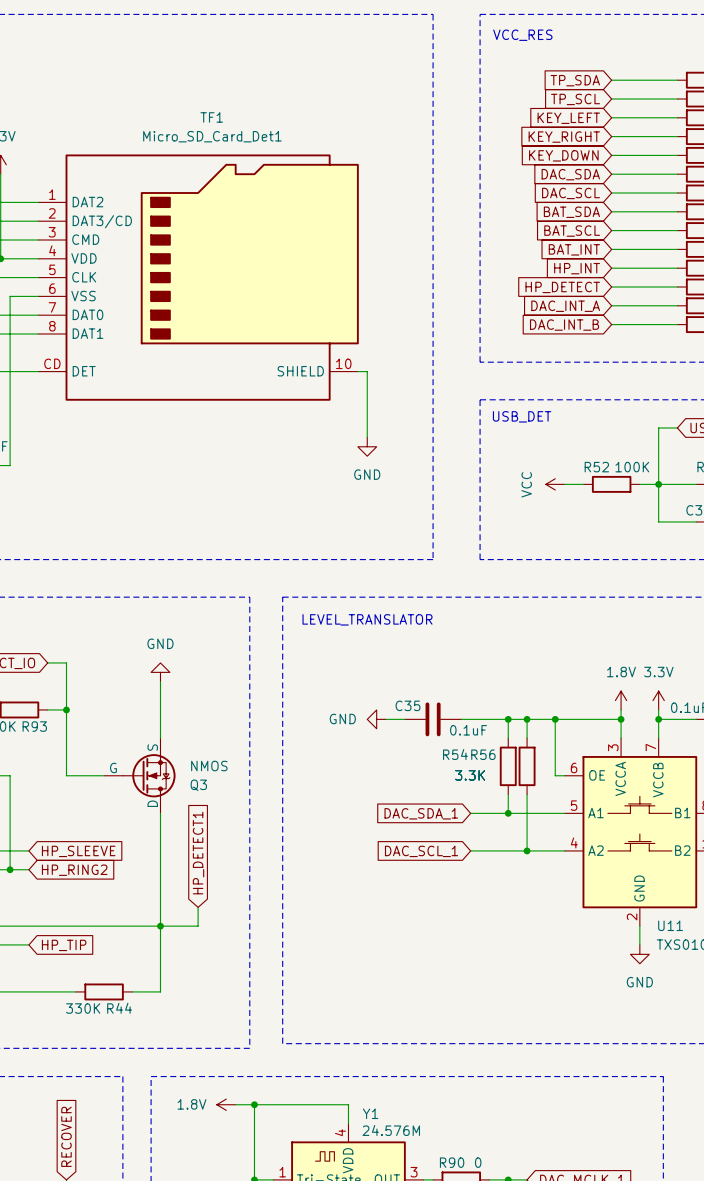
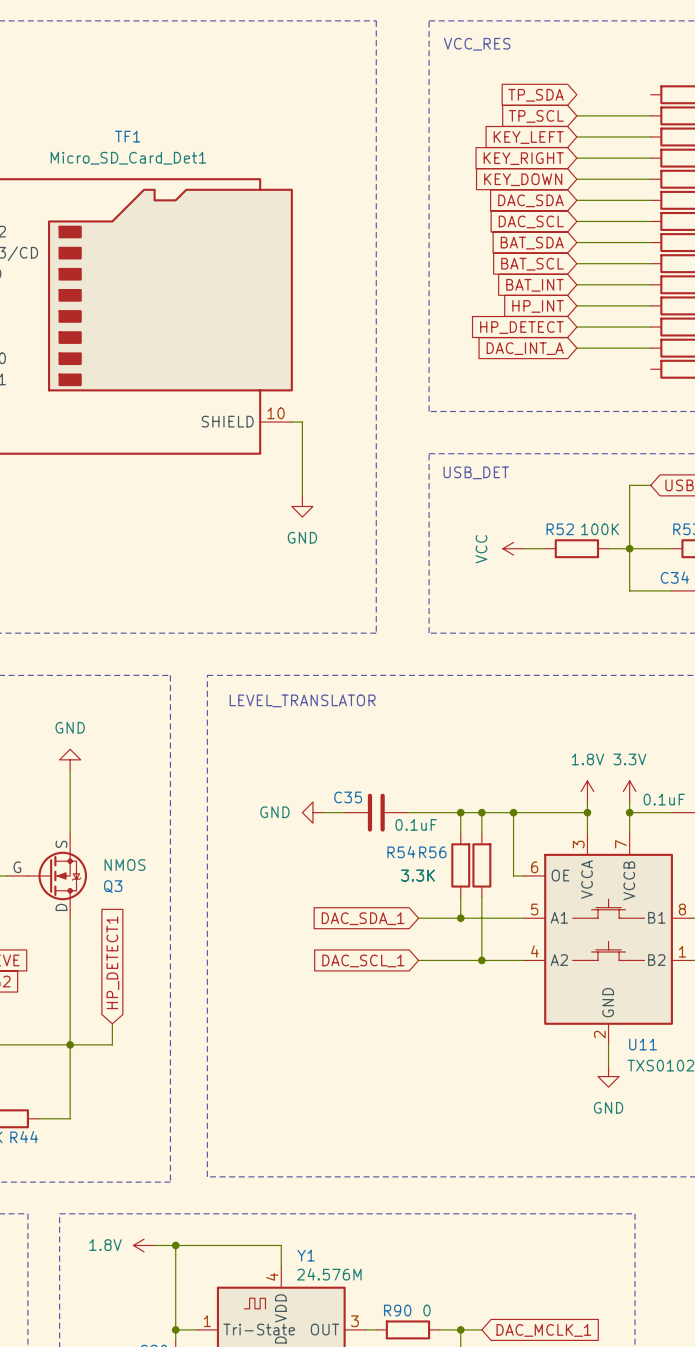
wire: (611, 80) (677, 80) -> none
wire: (611, 324) (677, 324) -> none
global label: DAC_INT_B (564, 325) -> none

